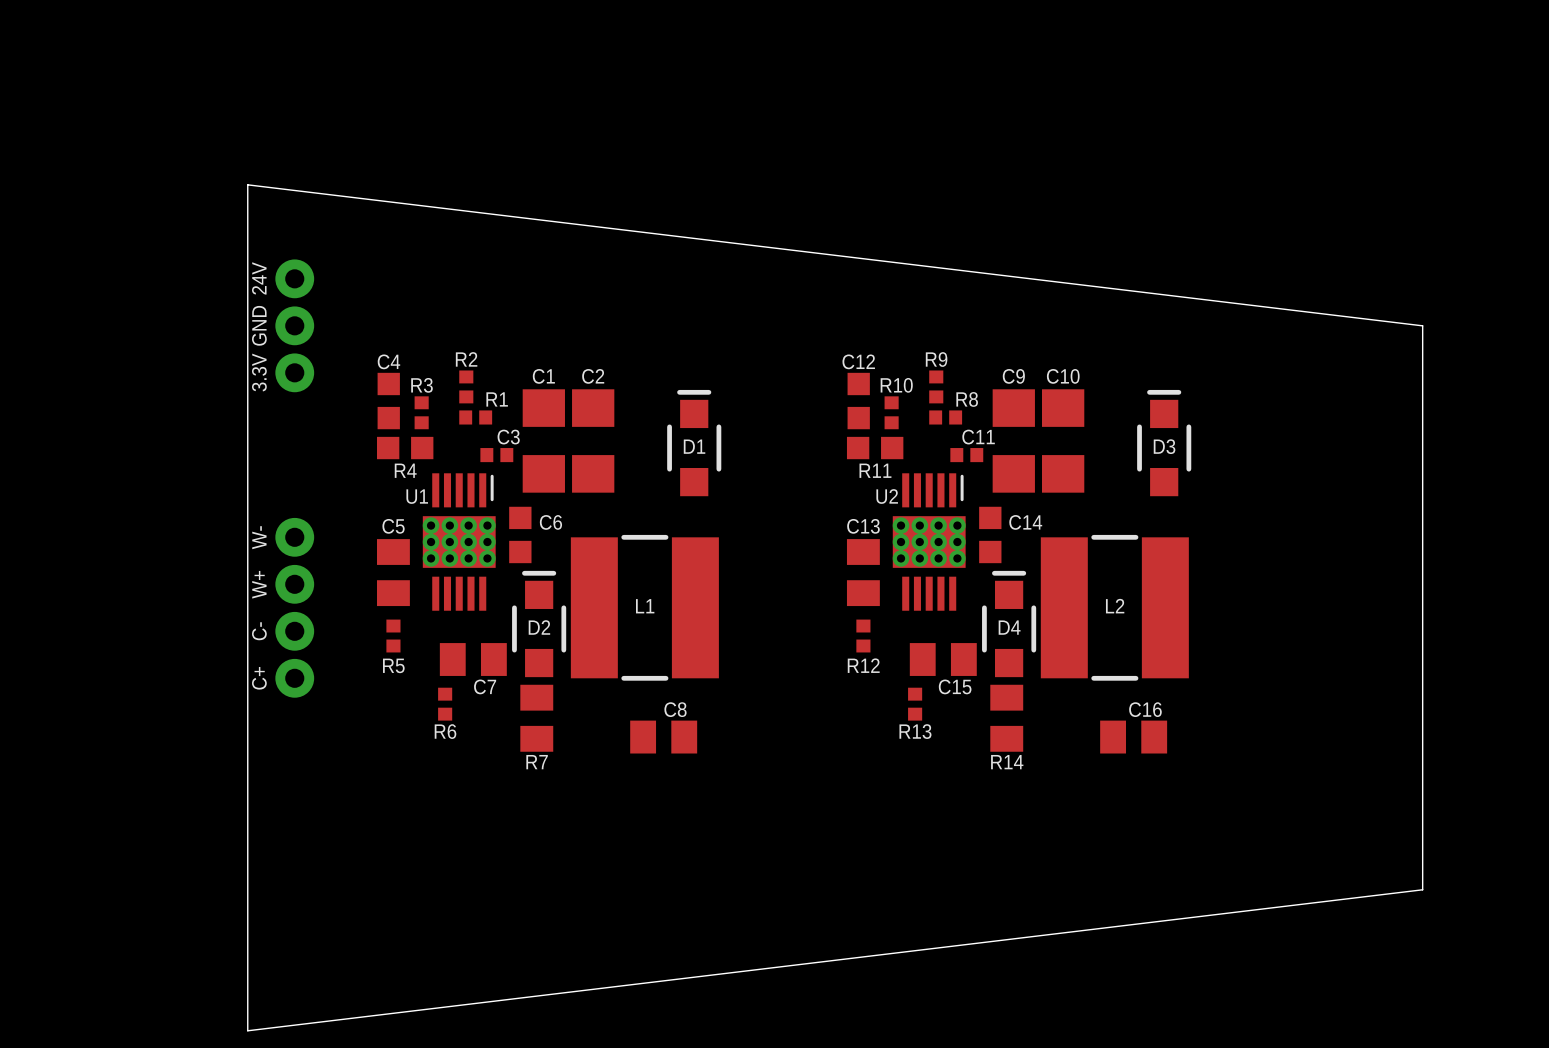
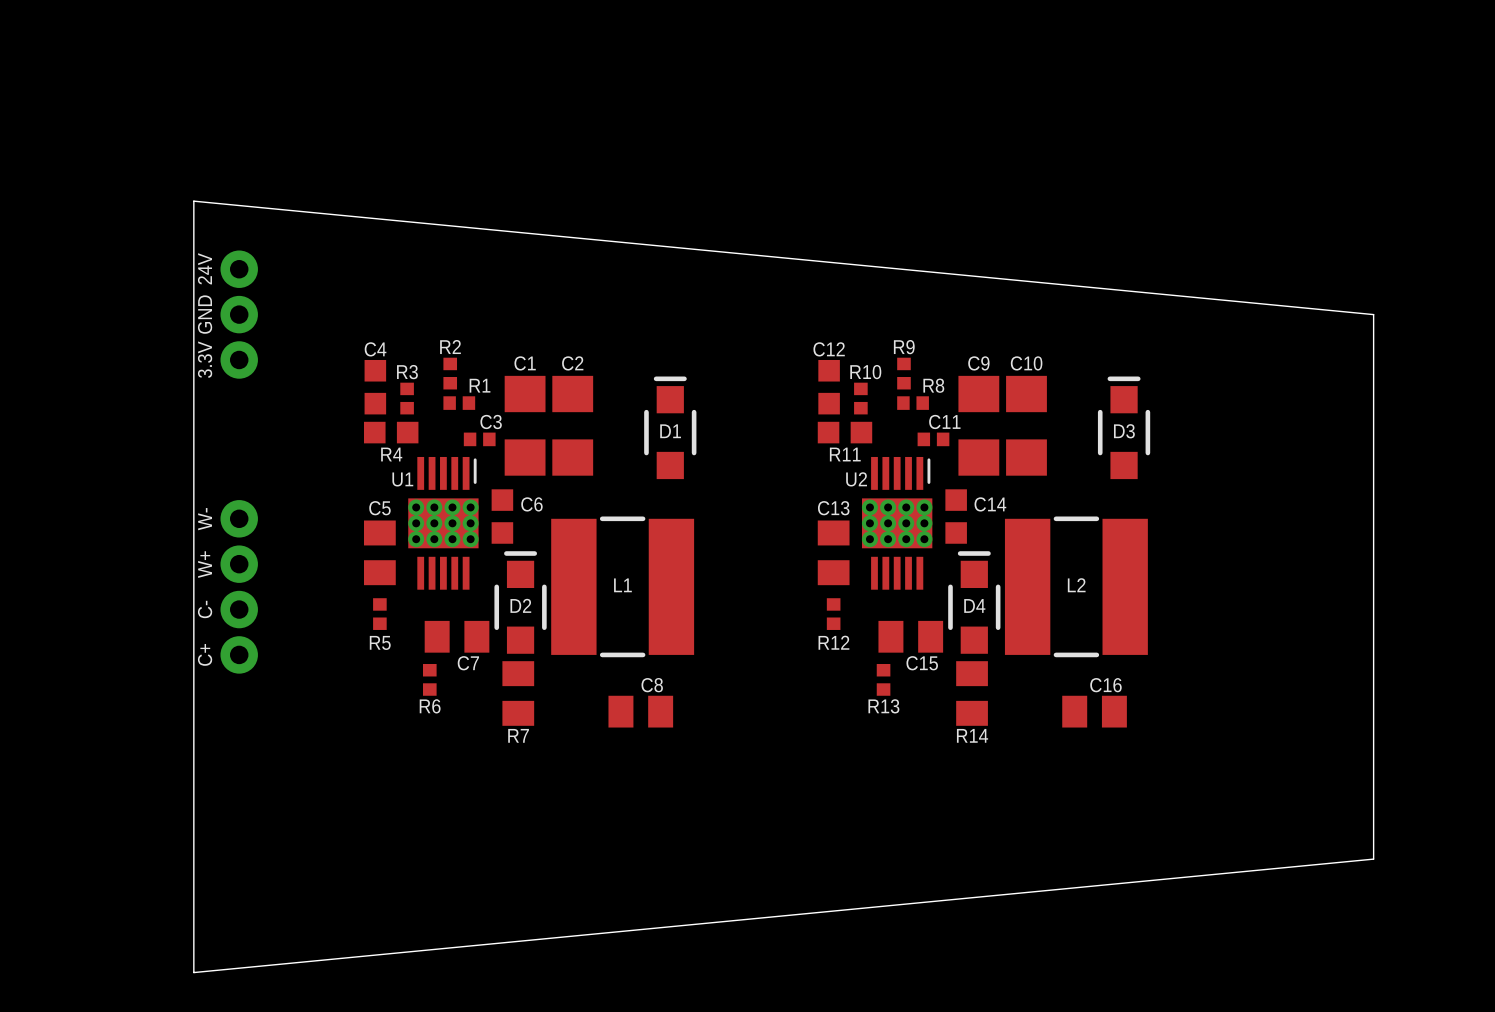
24V position: (294, 278) -> (239, 269)
GND position: (294, 325) -> (239, 314)
board edge: (1422, 325) (247, 184) (247, 1030) (1422, 889) -> (1373, 314) (193, 201) (193, 972) (1373, 859)
3.3V position: (294, 372) -> (239, 359)
W- position: (294, 537) -> (239, 518)
W+ position: (294, 584) -> (239, 564)
C- position: (294, 631) -> (239, 609)
C+ position: (294, 678) -> (239, 654)

